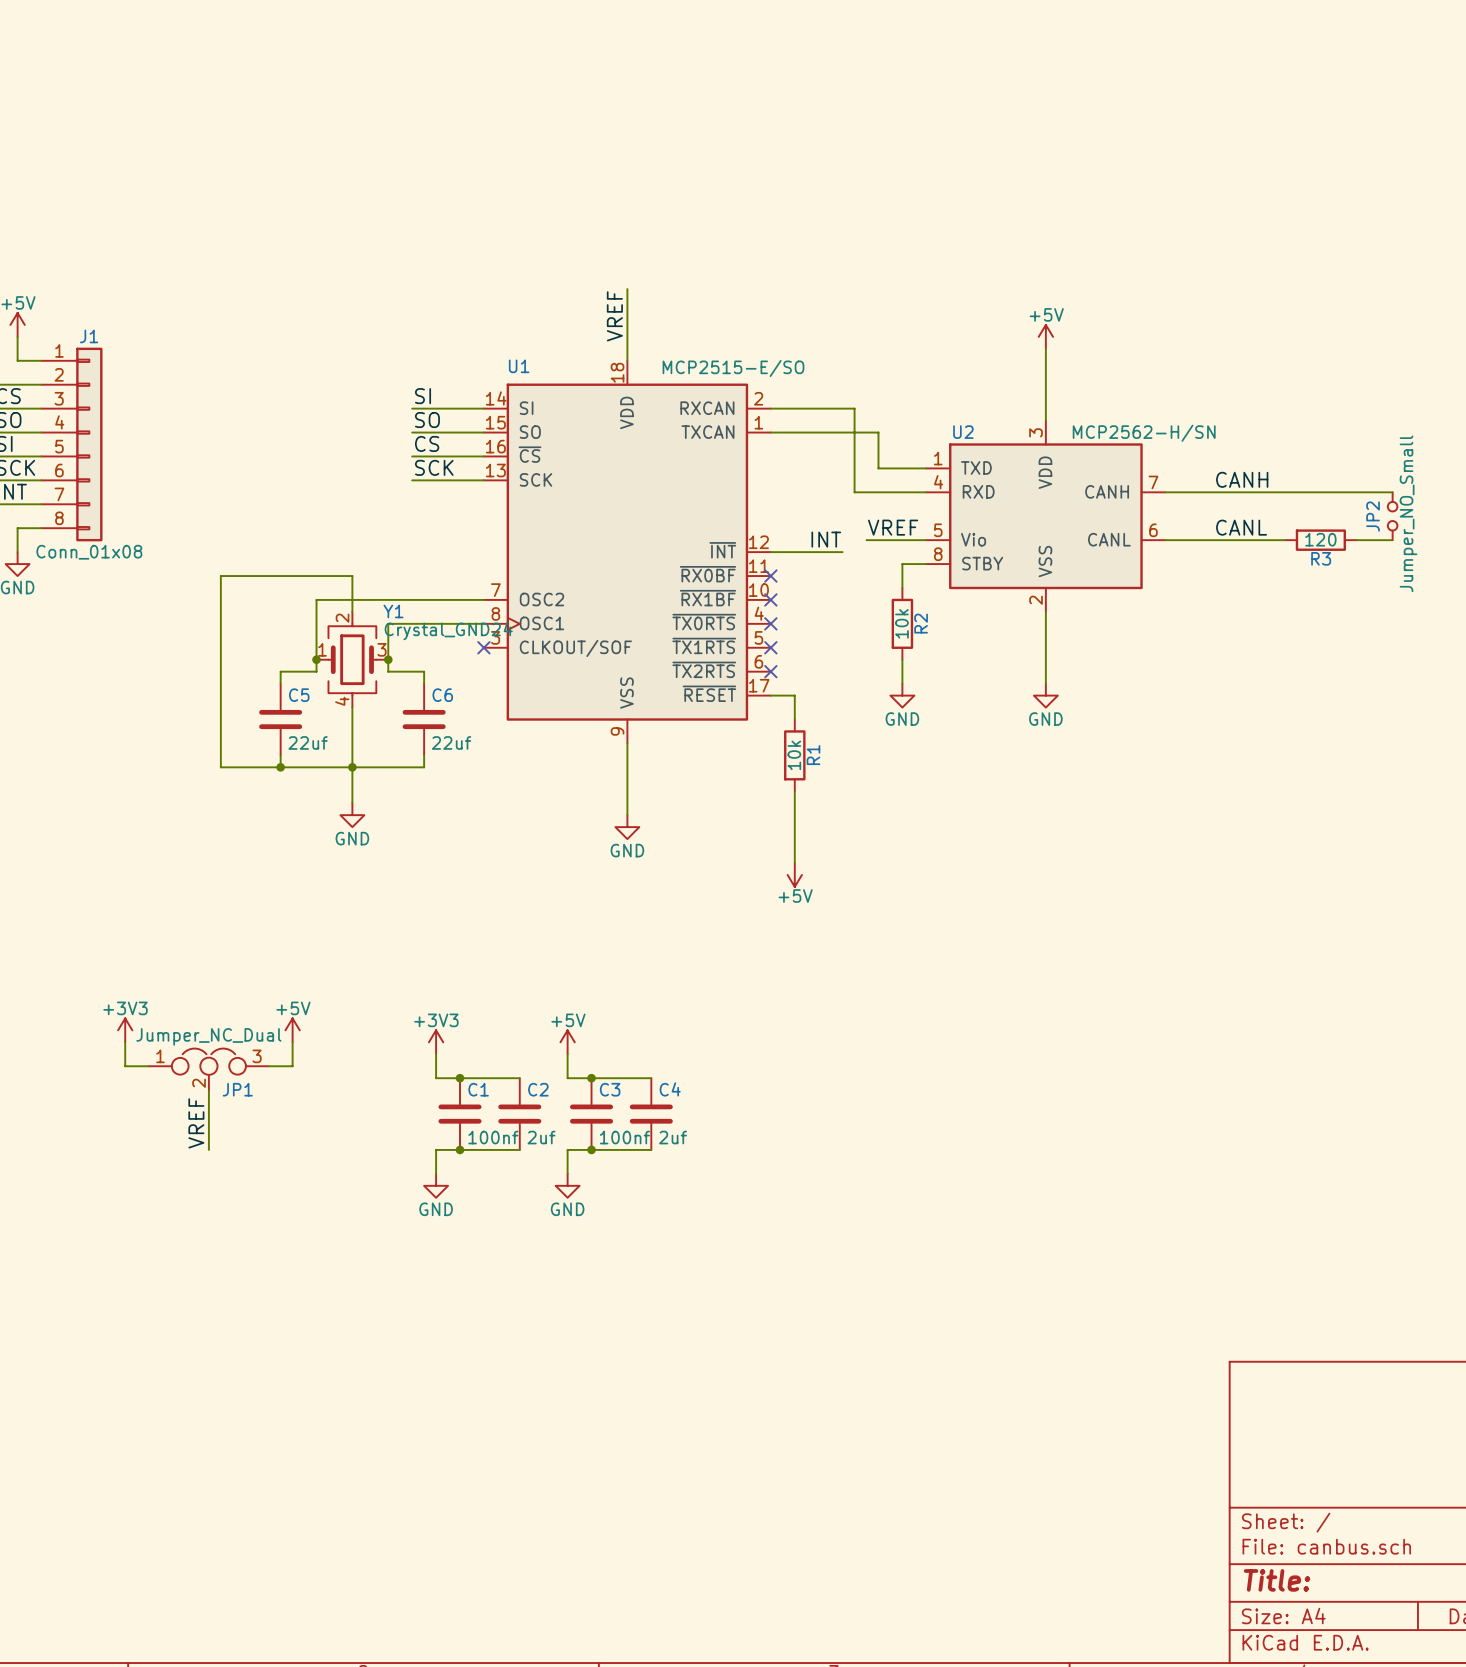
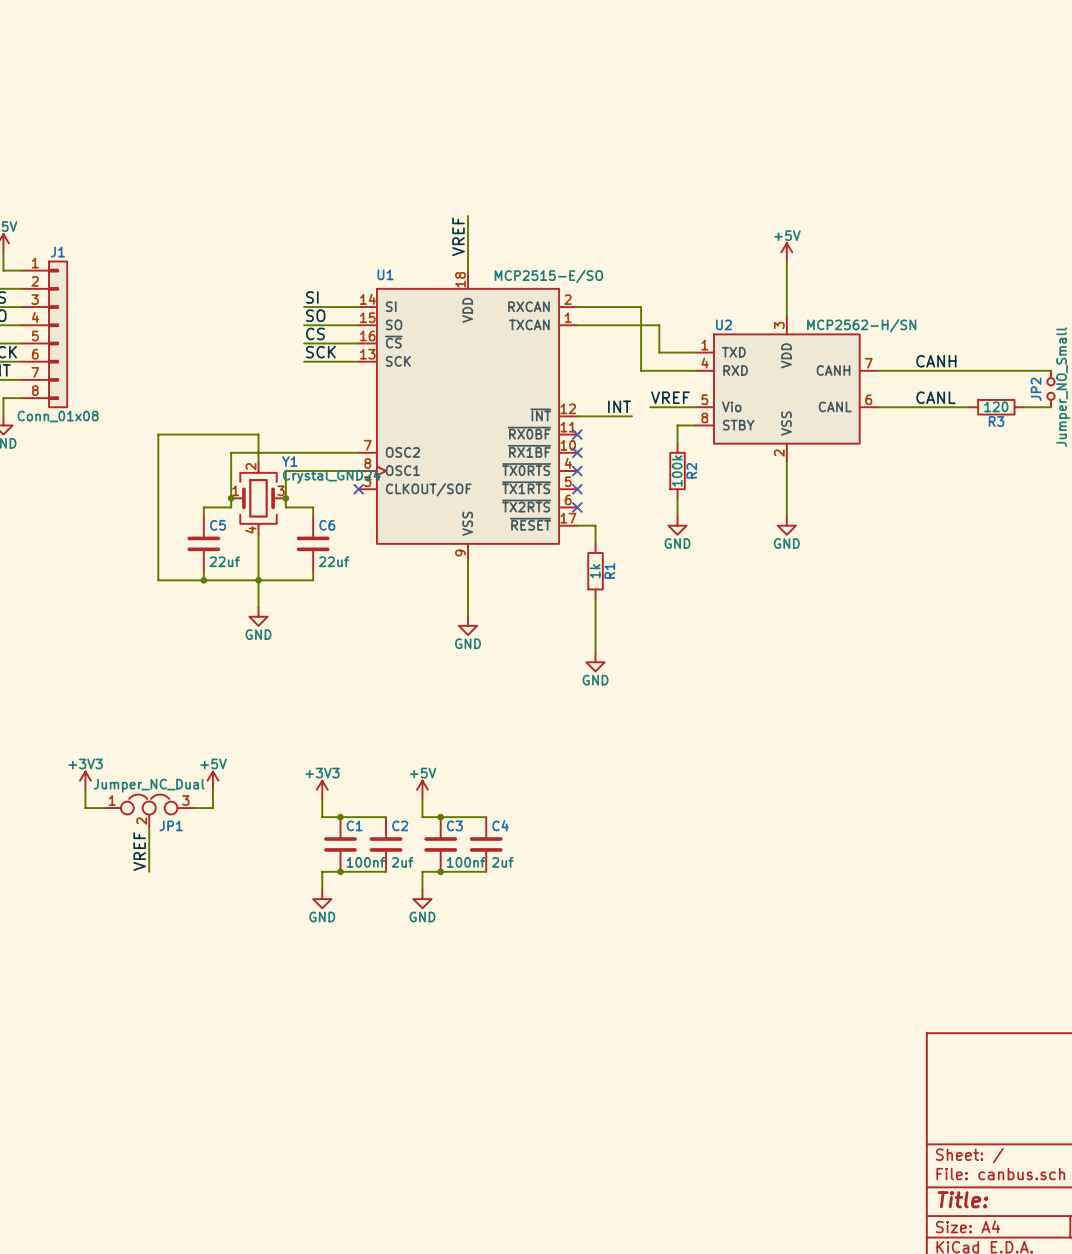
R2 value: 10k (901, 623) -> 100k (677, 471)
R1 value: 10k (794, 755) -> 1k (595, 571)
power symbol: +5V (794, 874) -> GND (595, 662)

